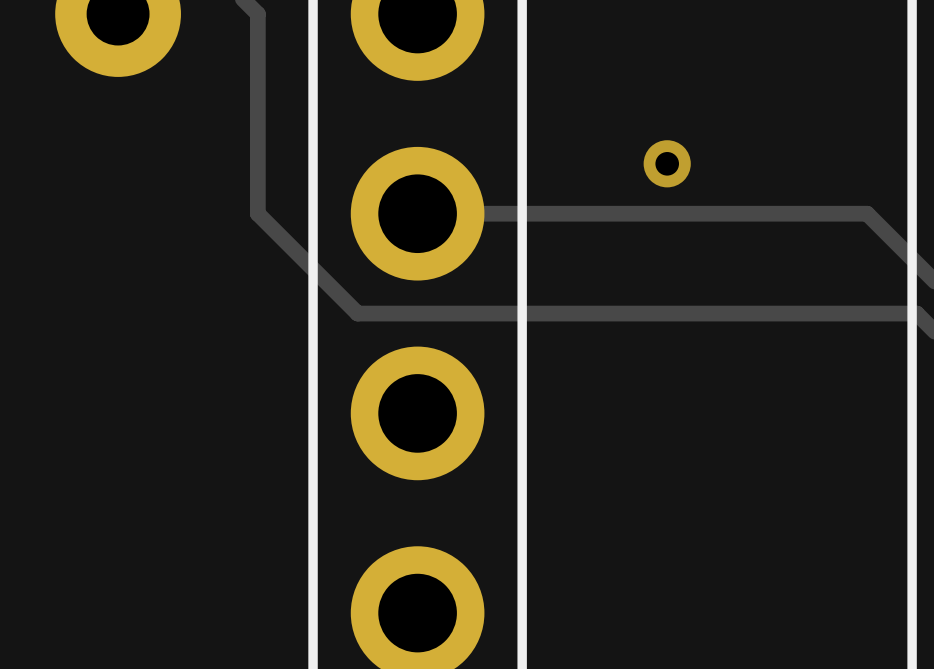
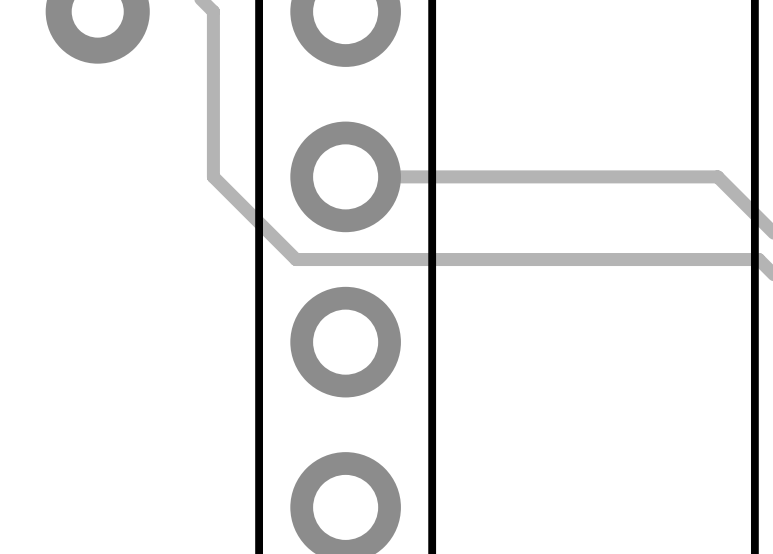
via: (667, 163) -> none

